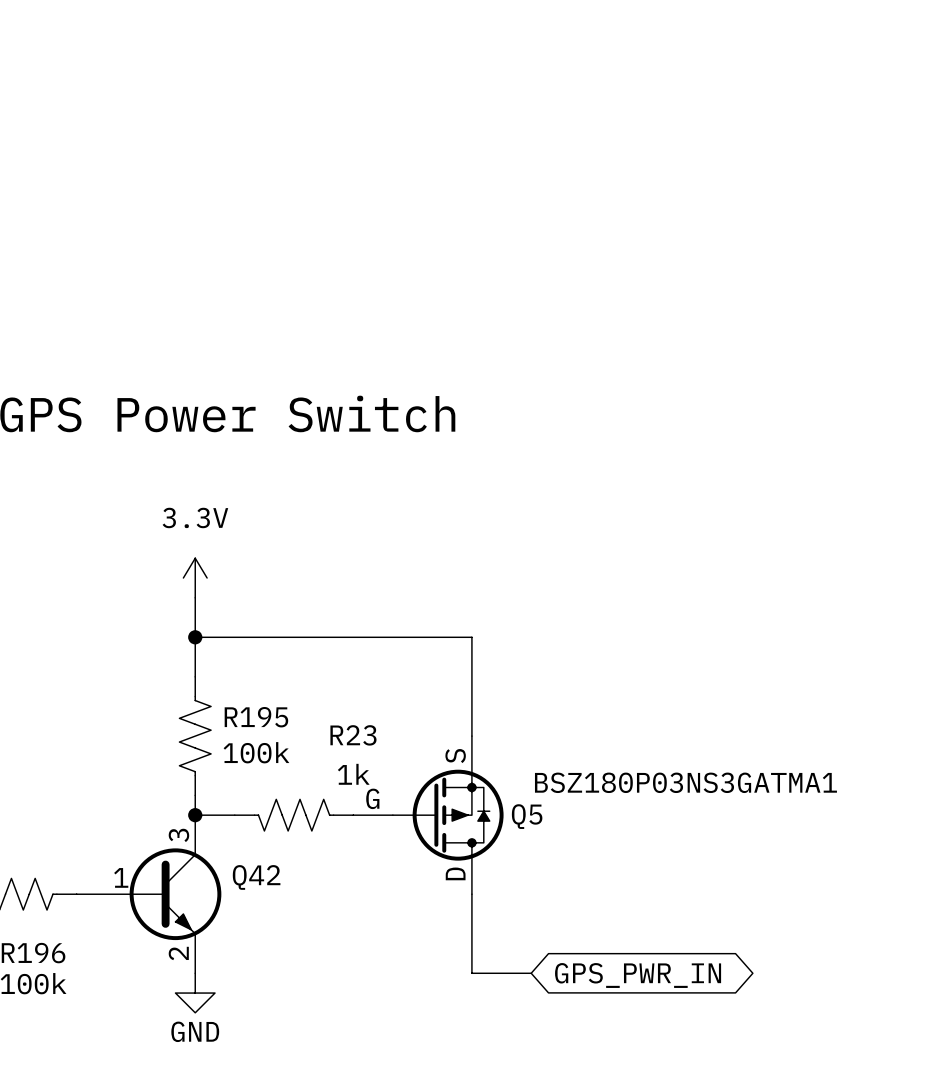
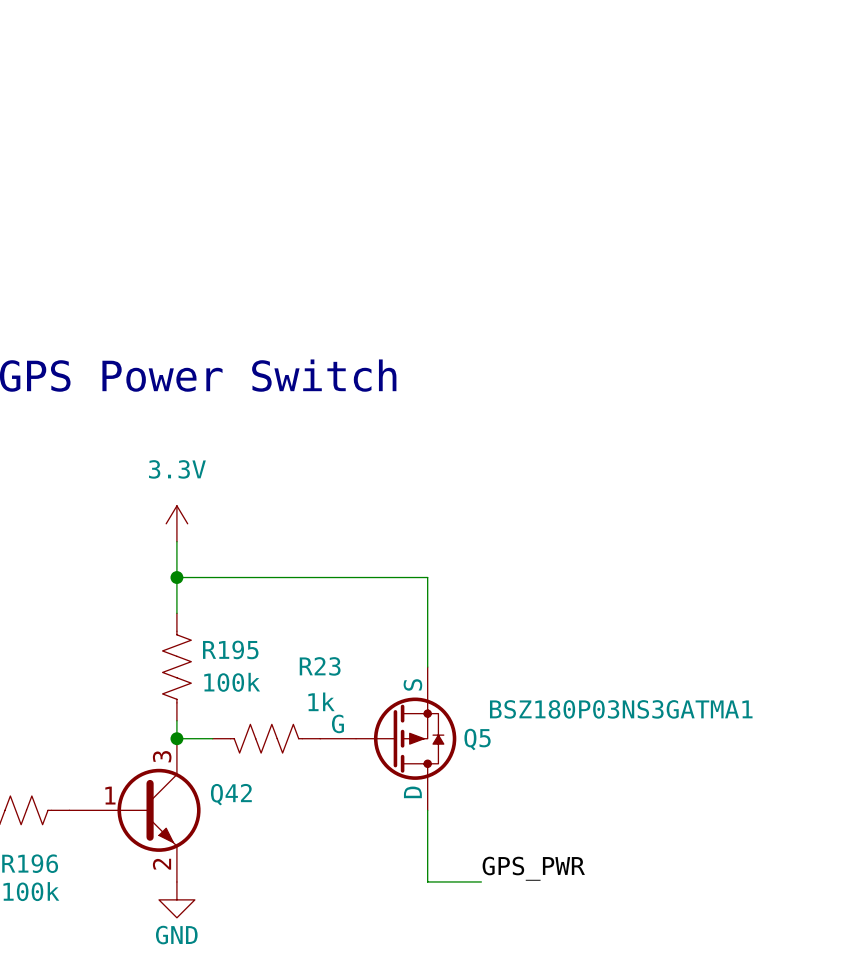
label: none -> GPS_PWR (533, 868)
global label: GPS_PWR_IN (638, 975) -> none

